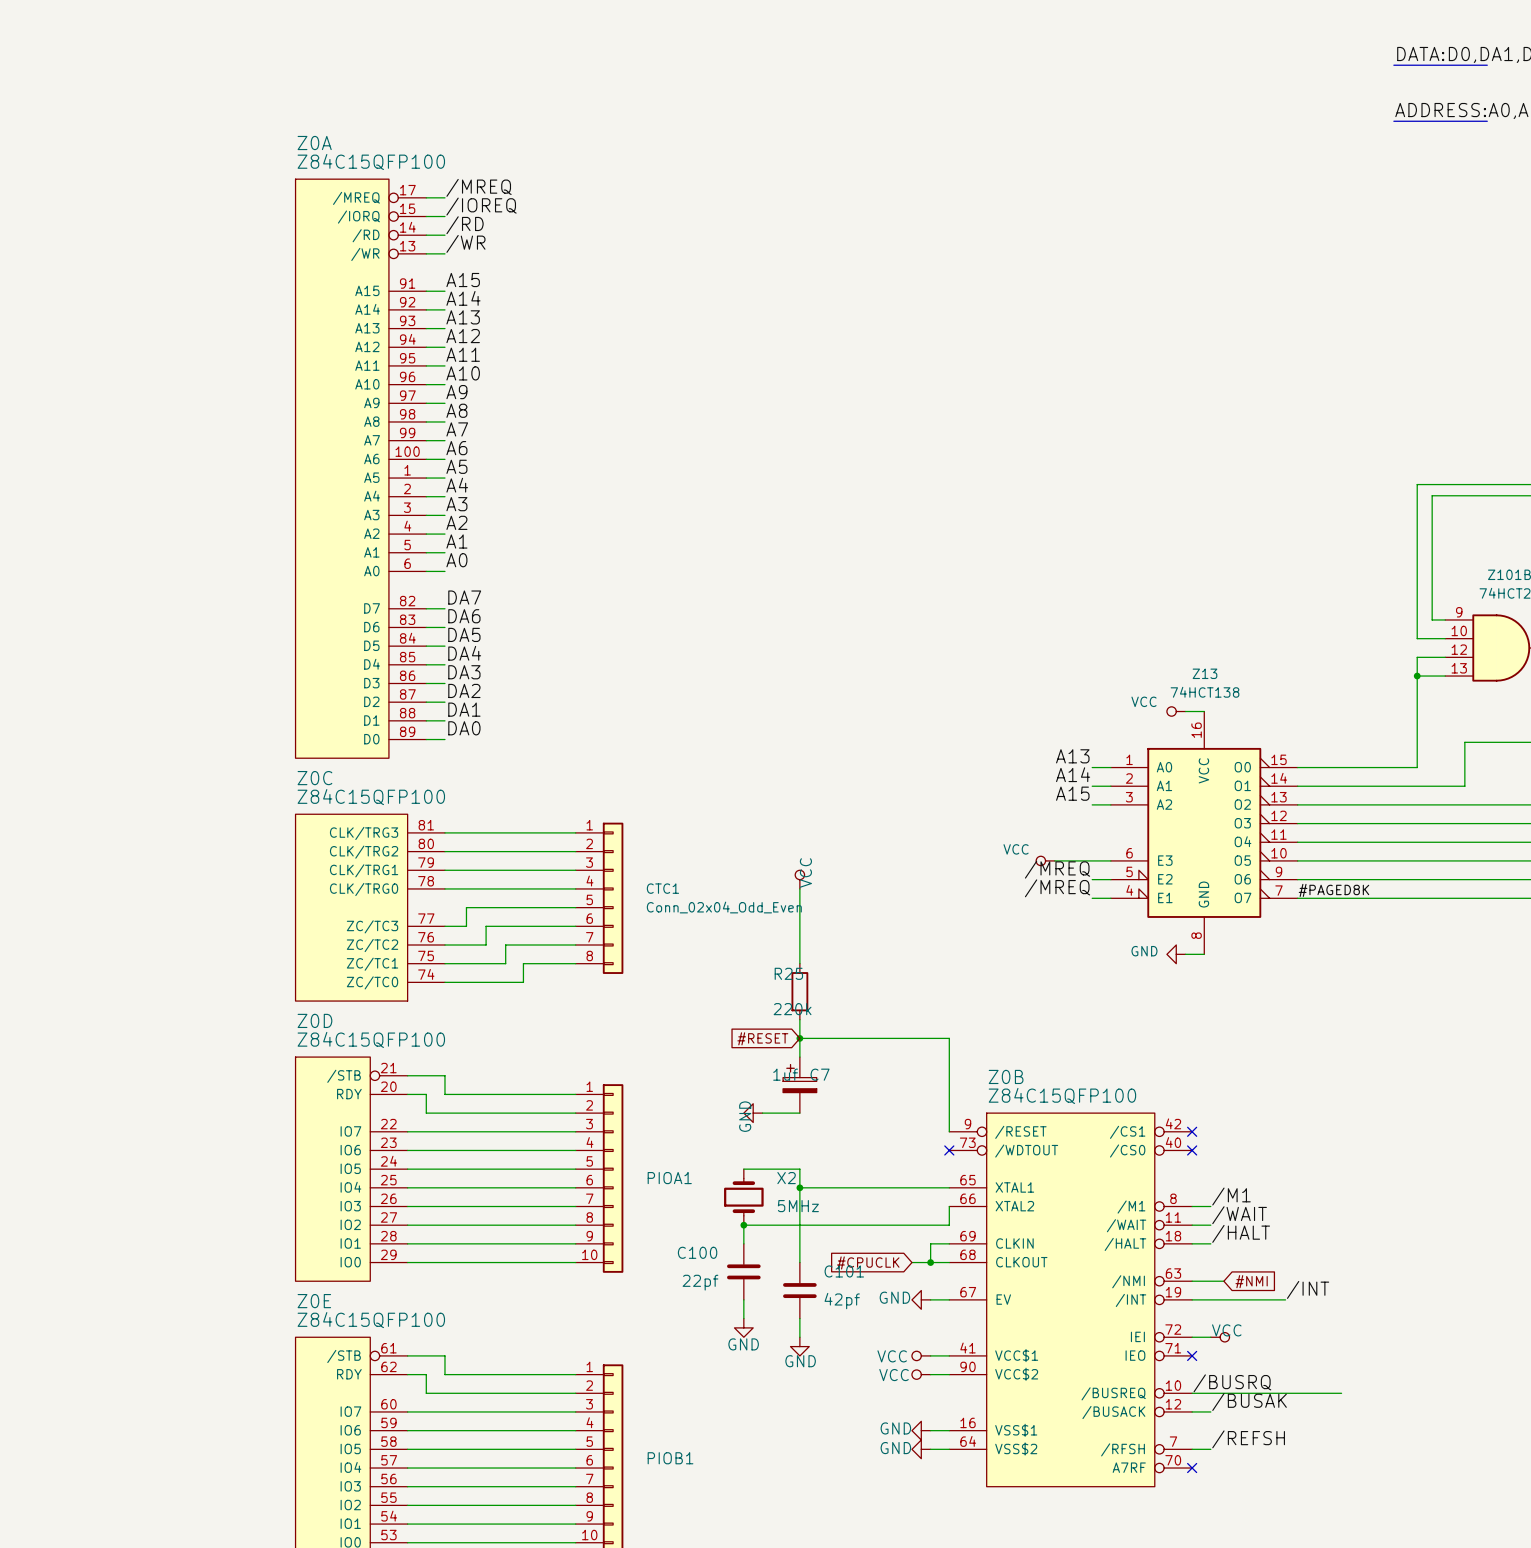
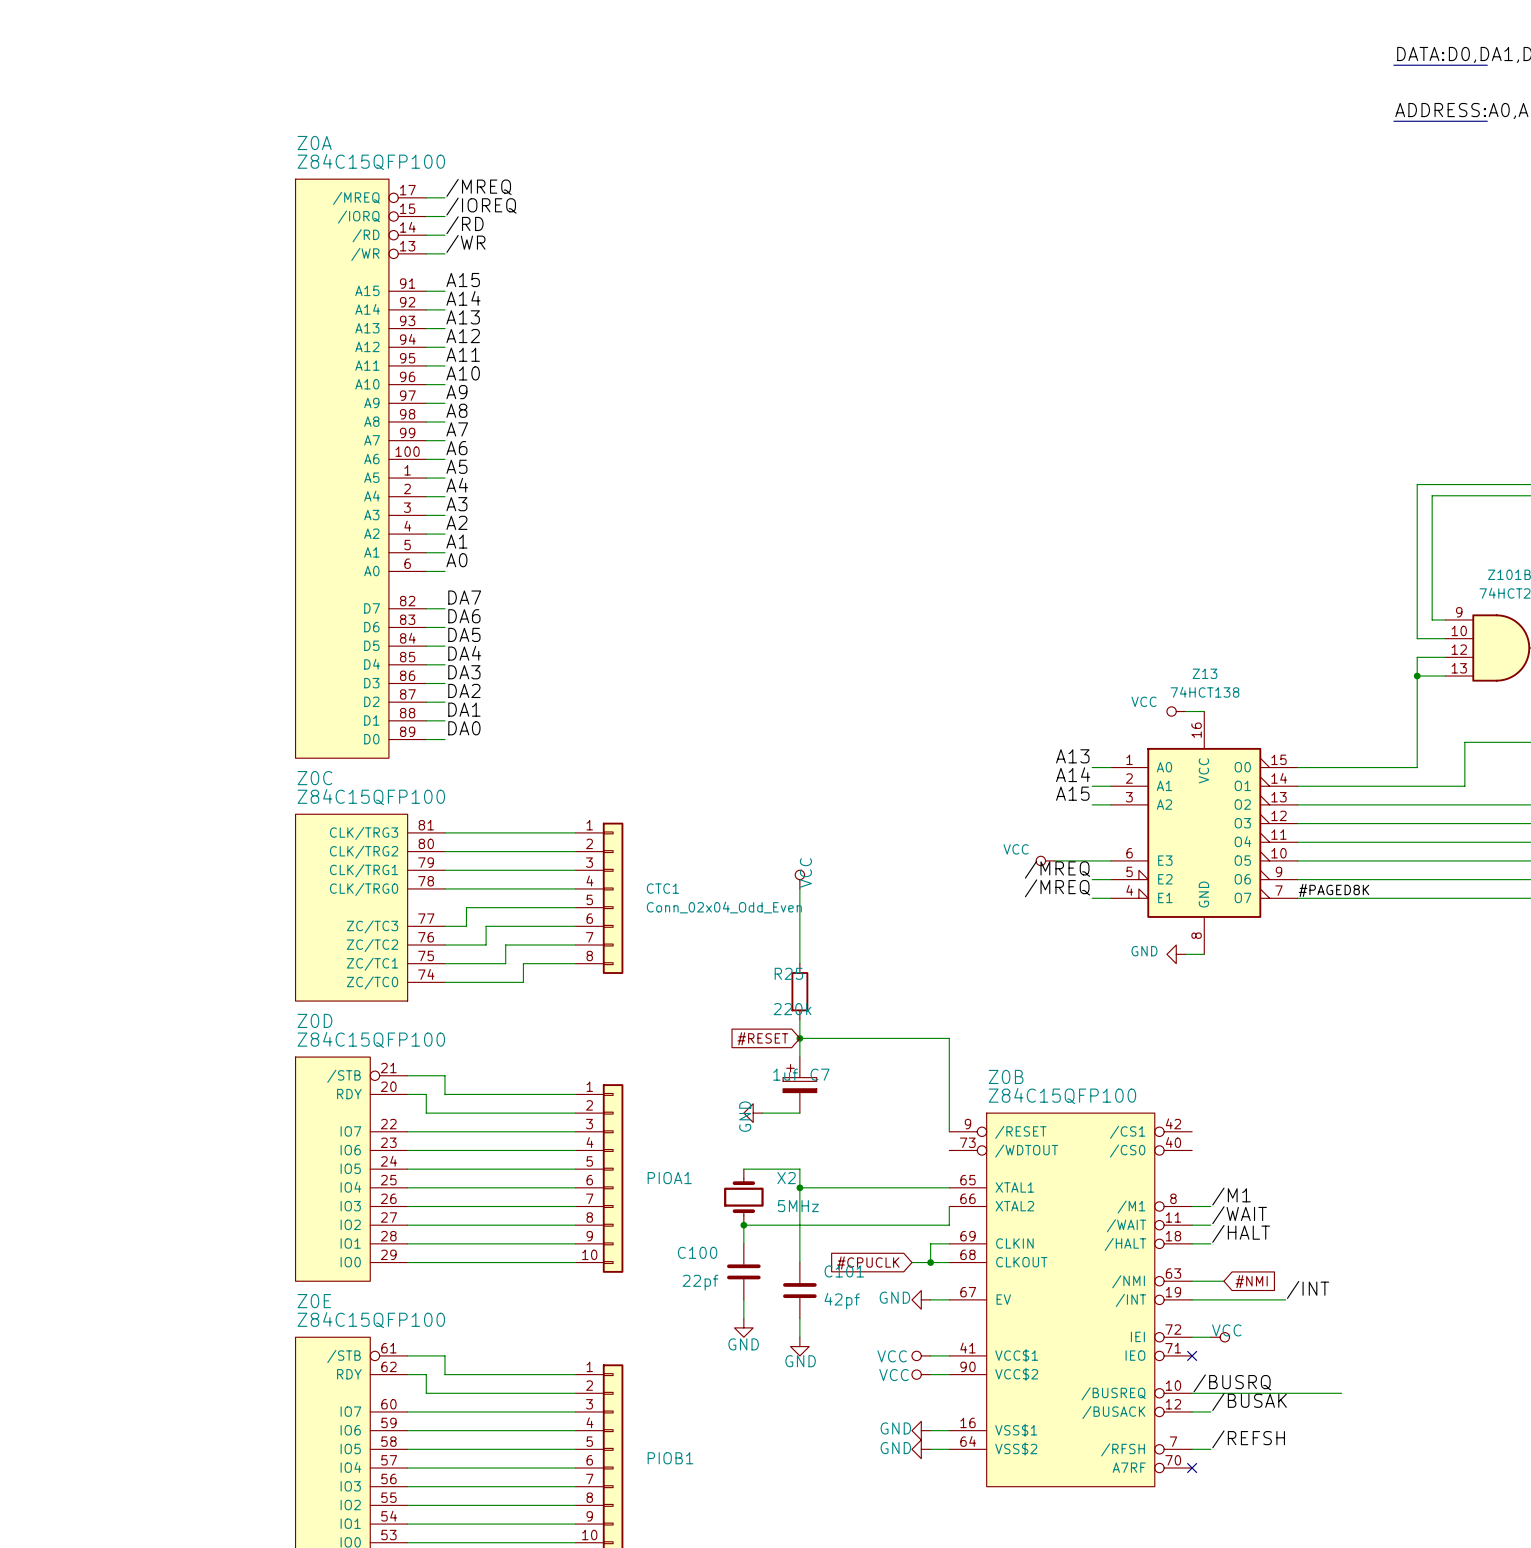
no-connect mark: (1192, 1131) -> none
no-connect mark: (949, 1150) -> none
no-connect mark: (1192, 1150) -> none

